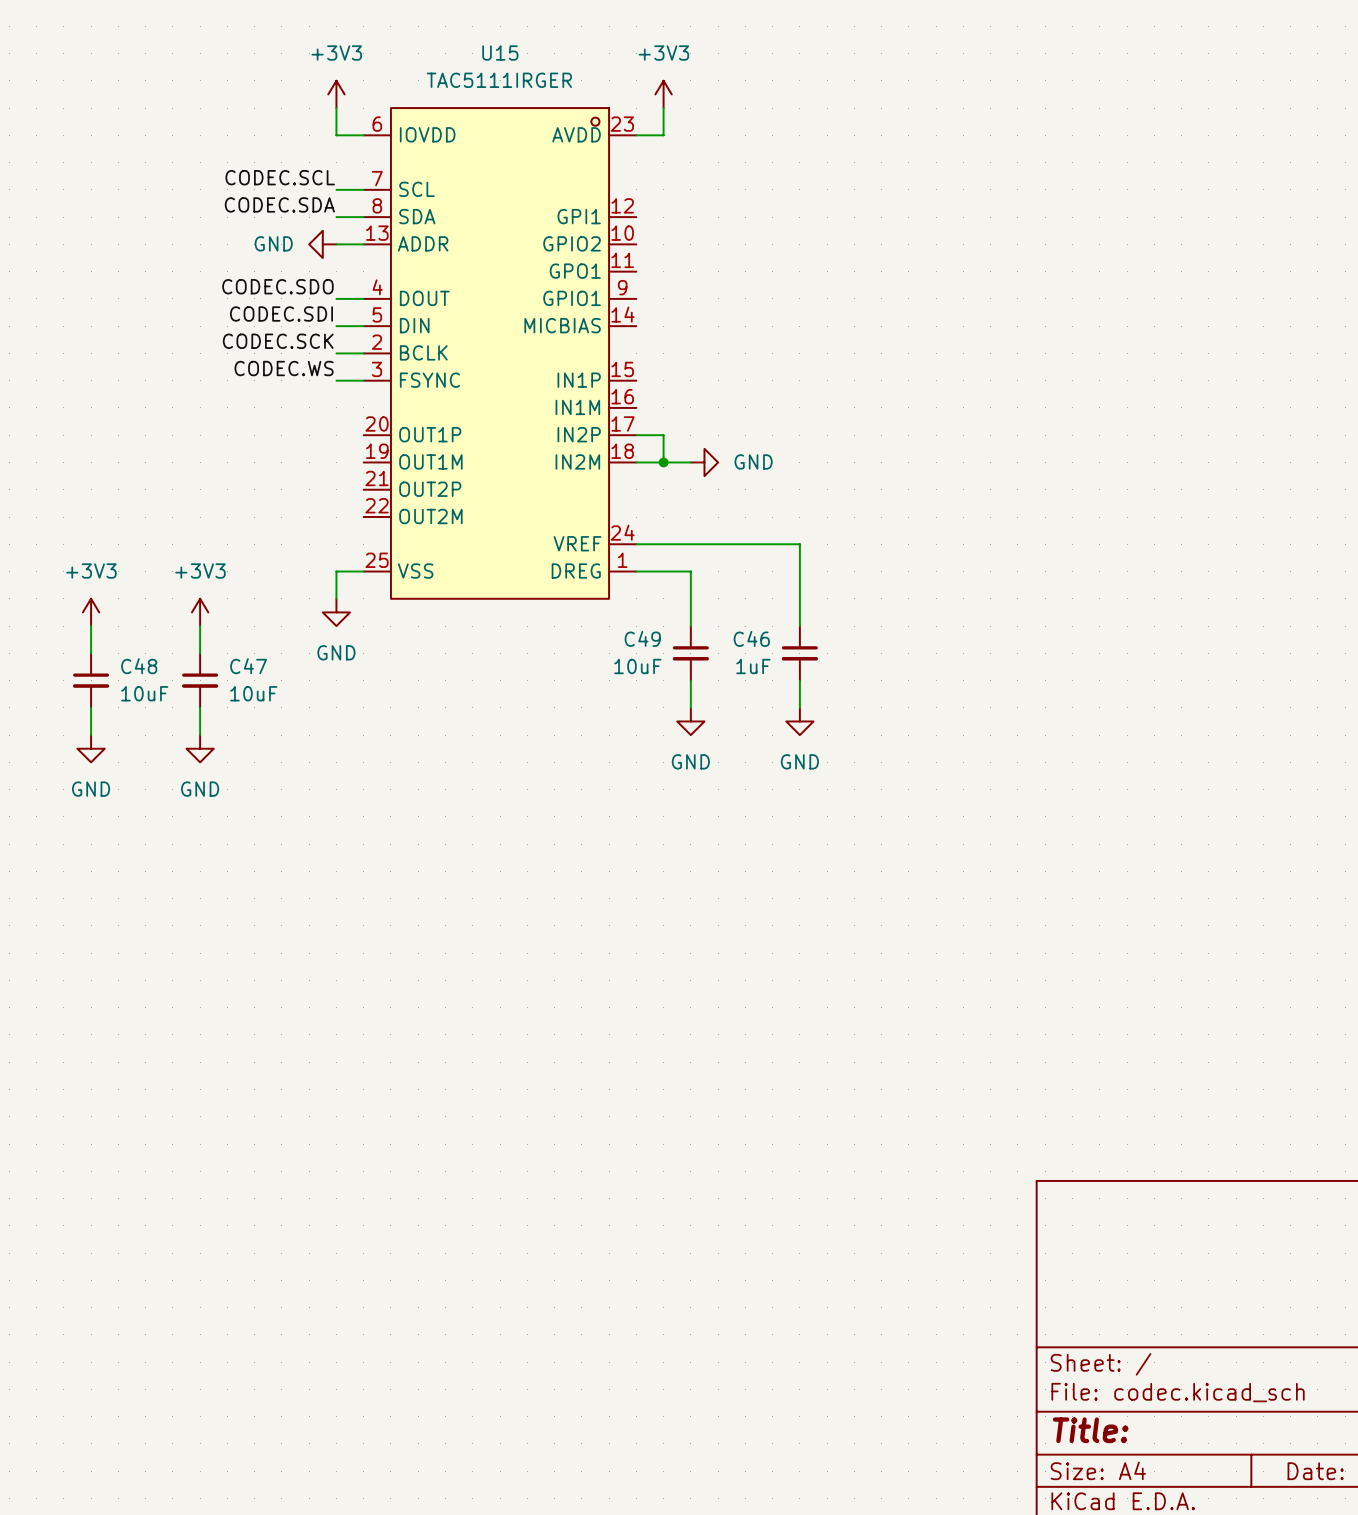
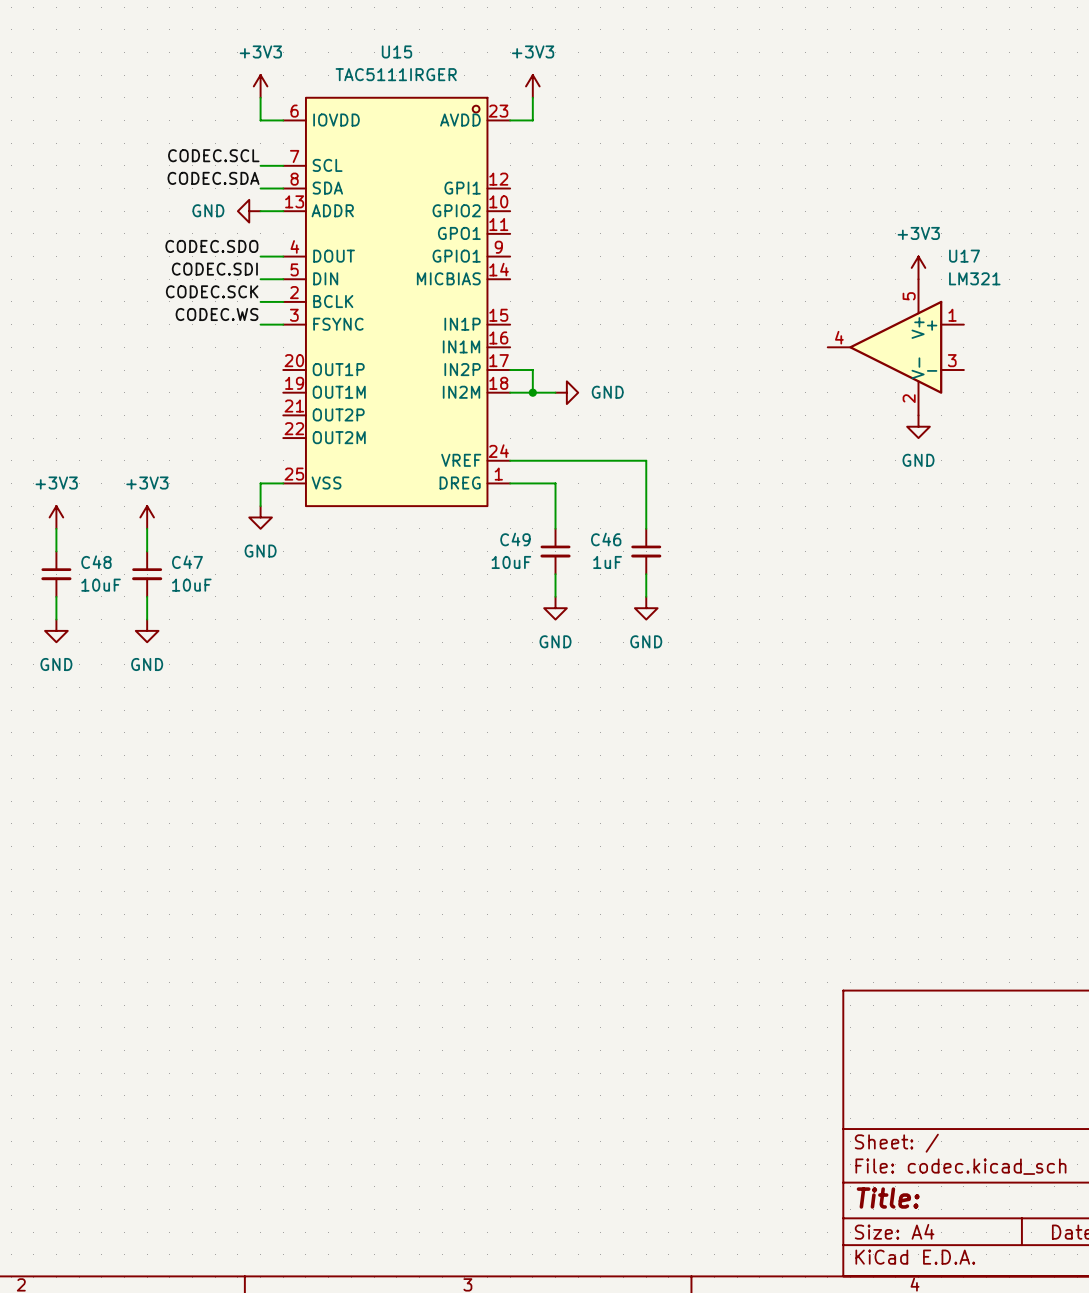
power symbol: none -> +3V3 (918, 267)
U17: none -> LM321 (895, 347)
power symbol: none -> GND (918, 426)

